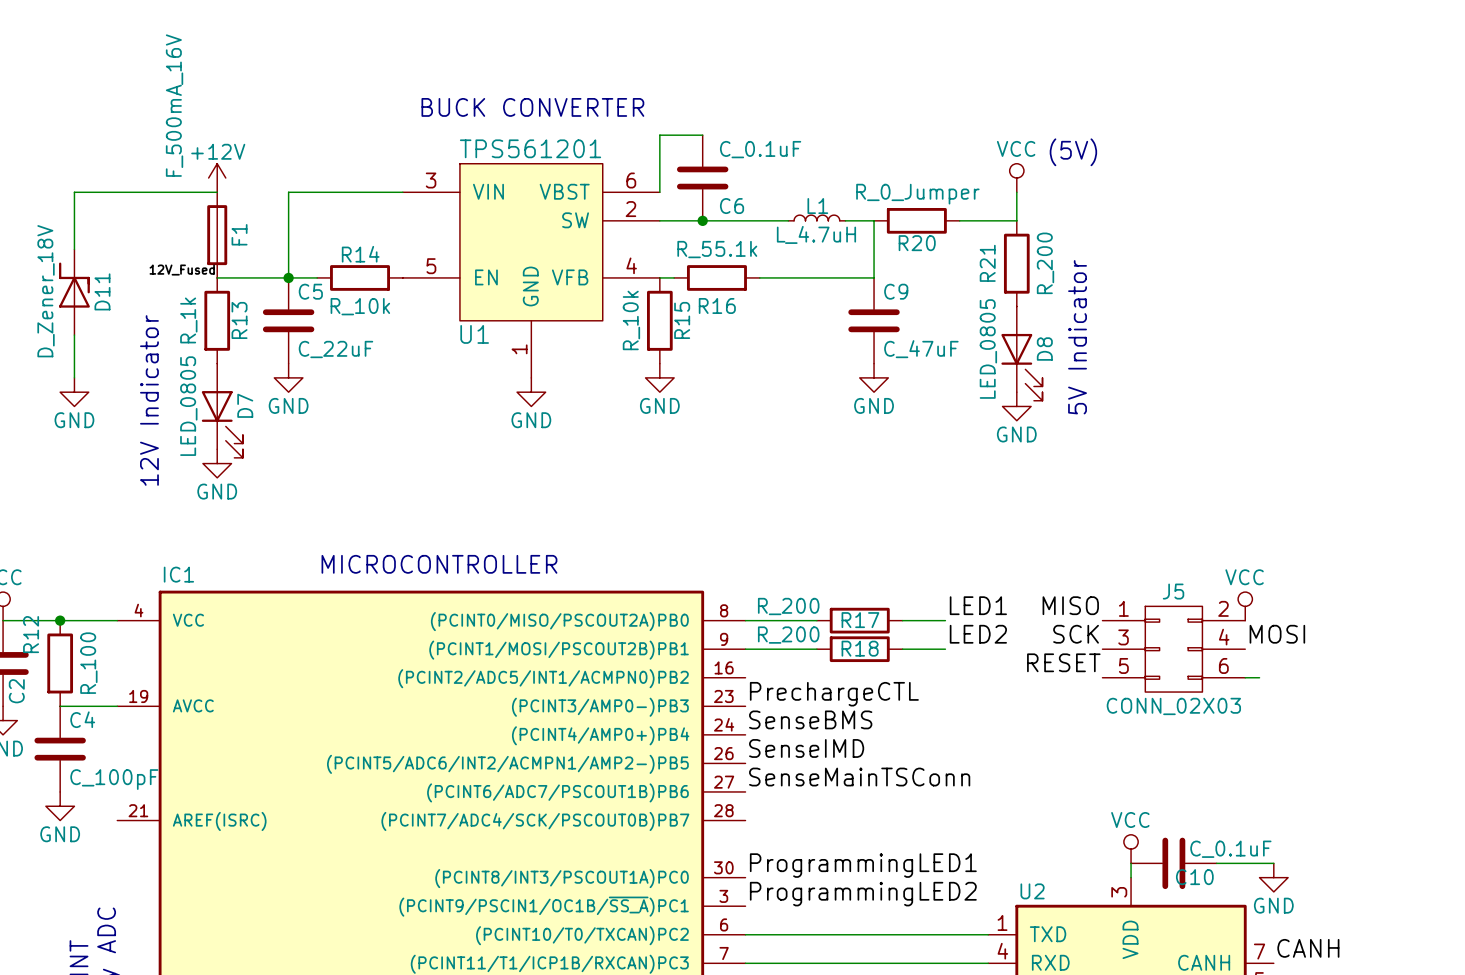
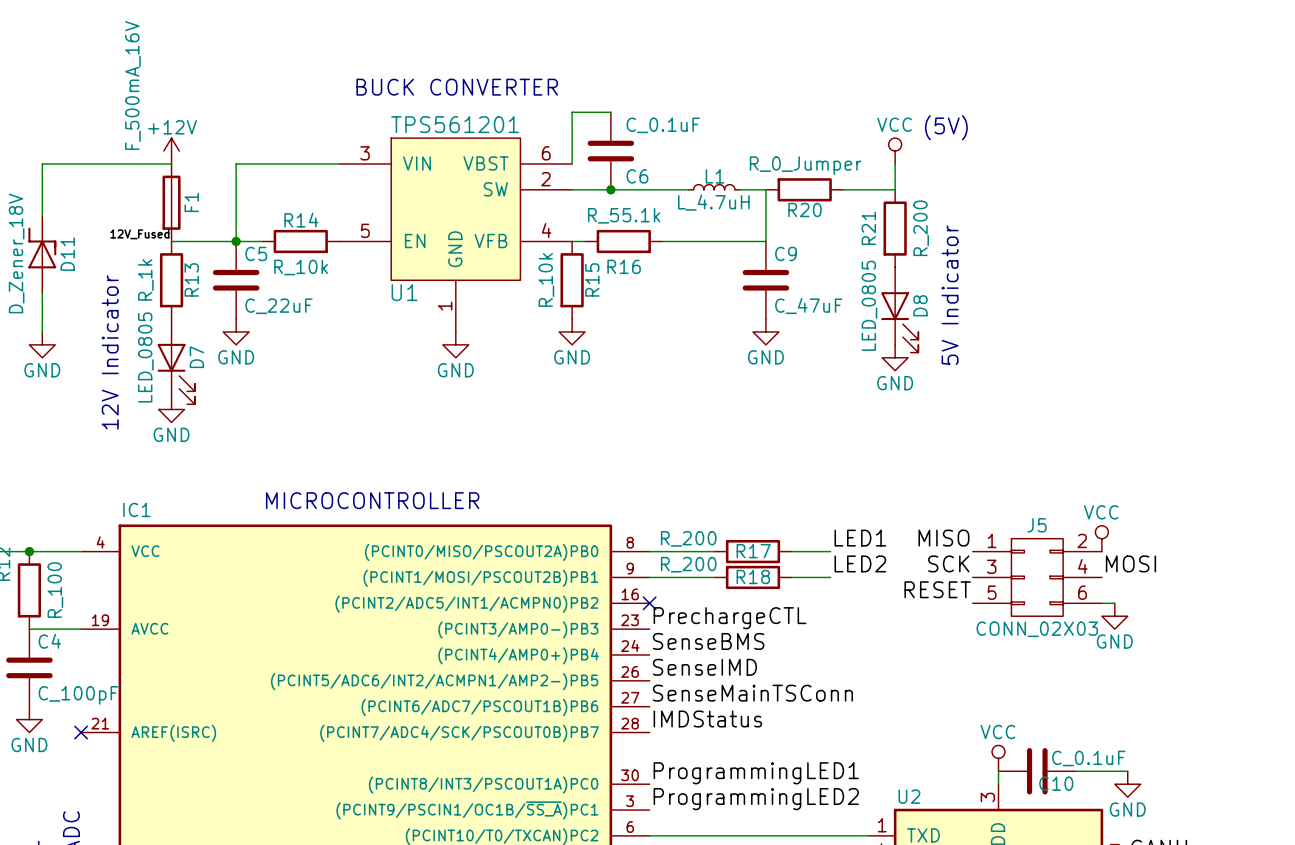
no-connect mark: none -> (649, 603)
power symbol: none -> GND (1114, 616)
label: none -> IMDStatus (707, 718)
no-connect mark: none -> (81, 732)

